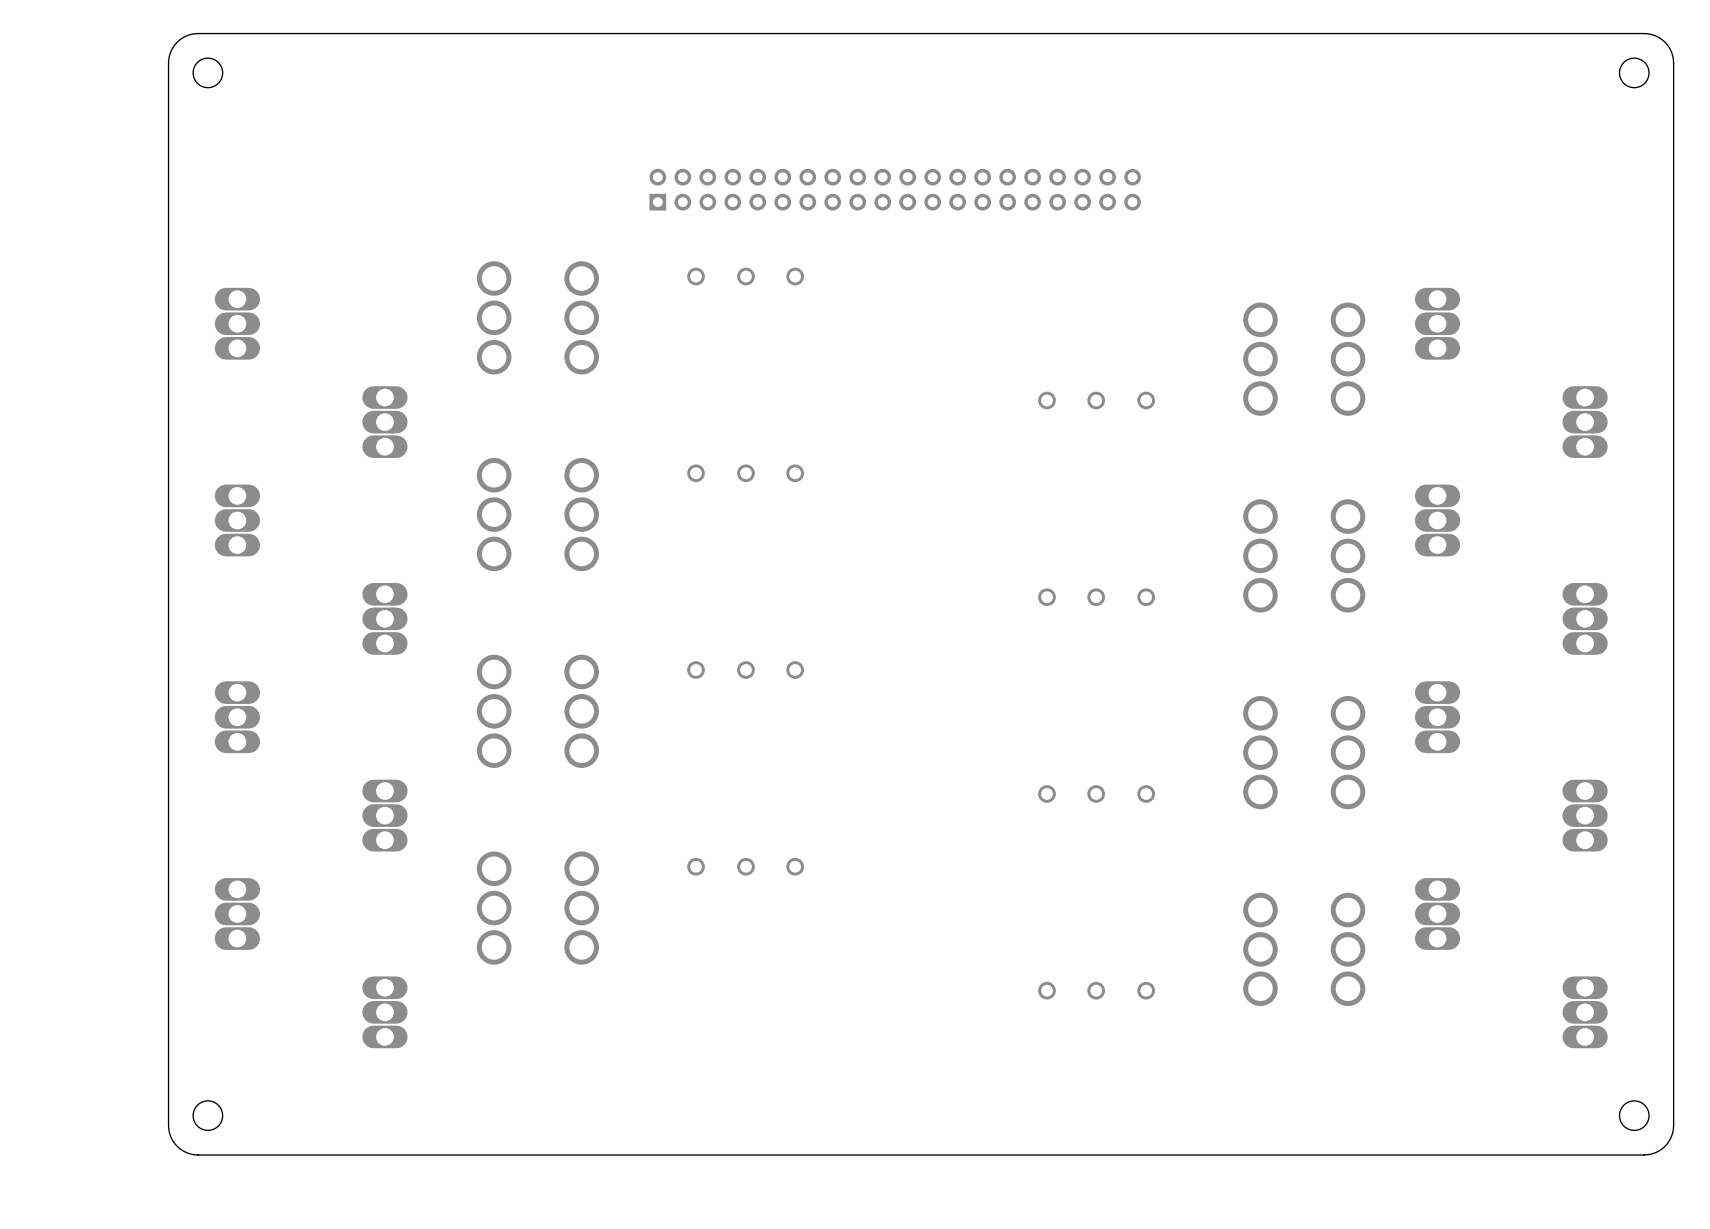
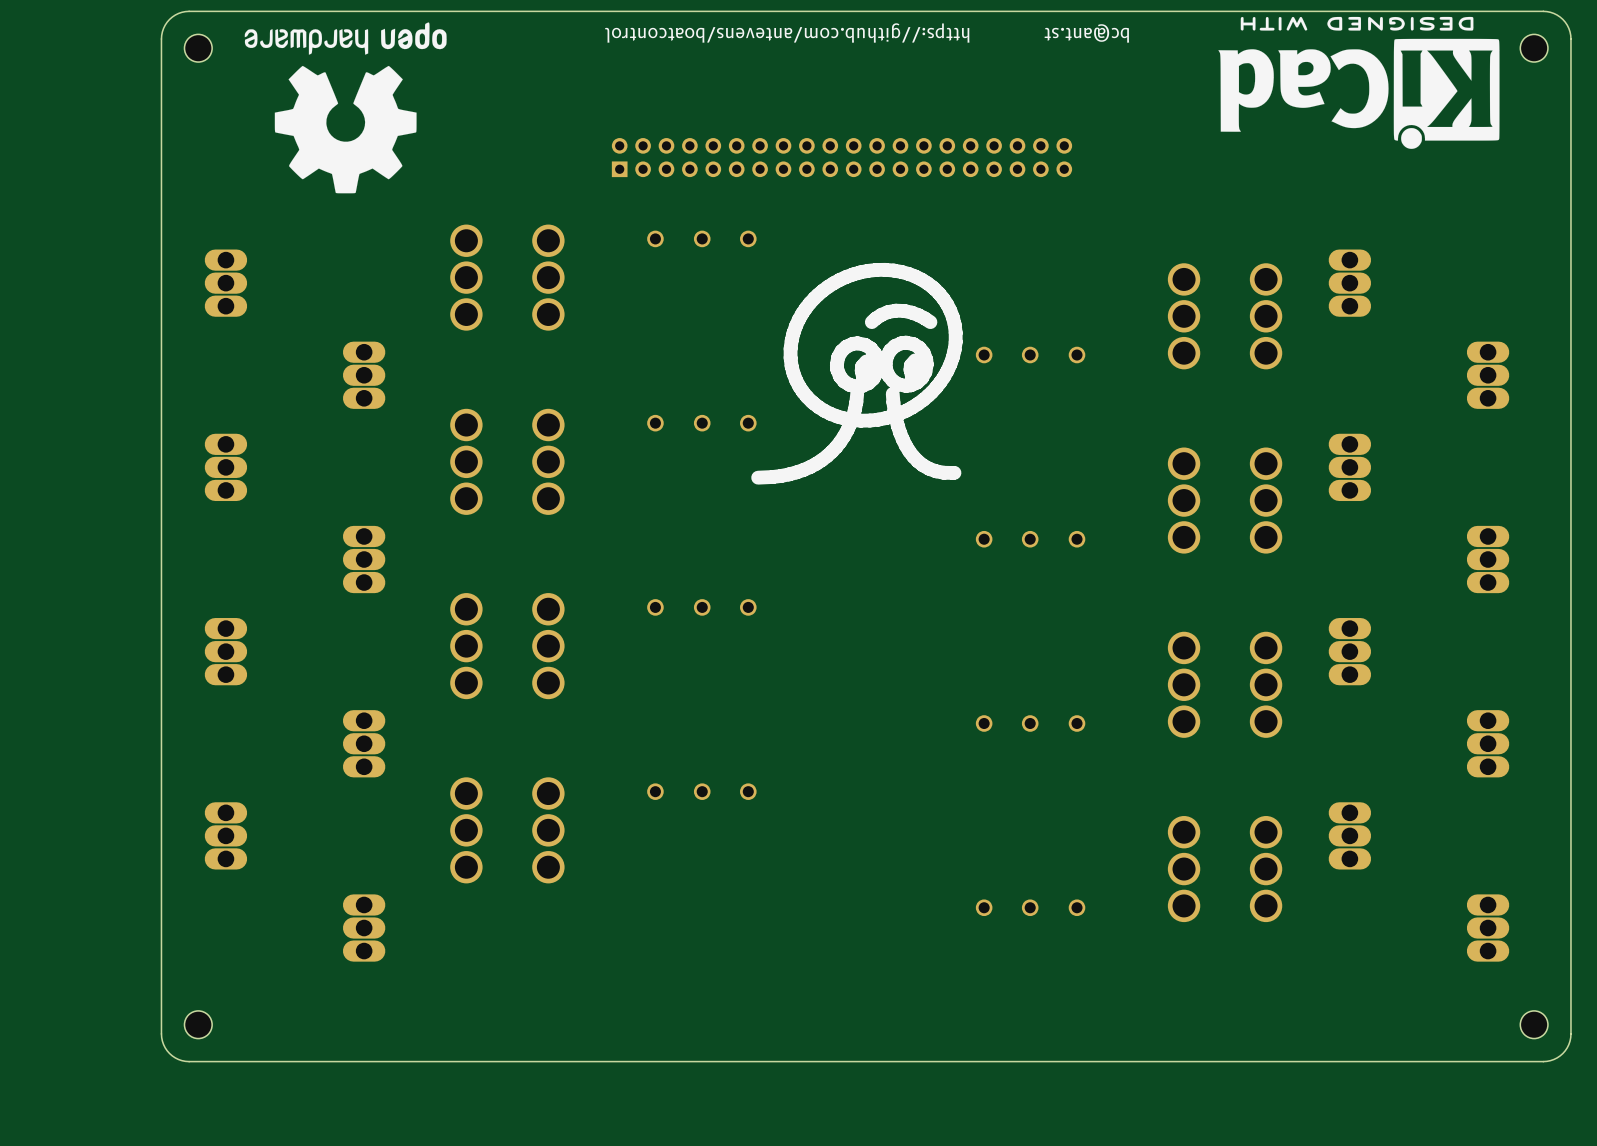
drawing: none -> [1218, 16, 1500, 149]
drawing: none -> [244, 22, 447, 194]
text: none -> https://github.com/antevens/boatcontrol (787, 33)
text: none -> bc@ant.st (1086, 33)
drawing: none -> [751, 262, 963, 485]

